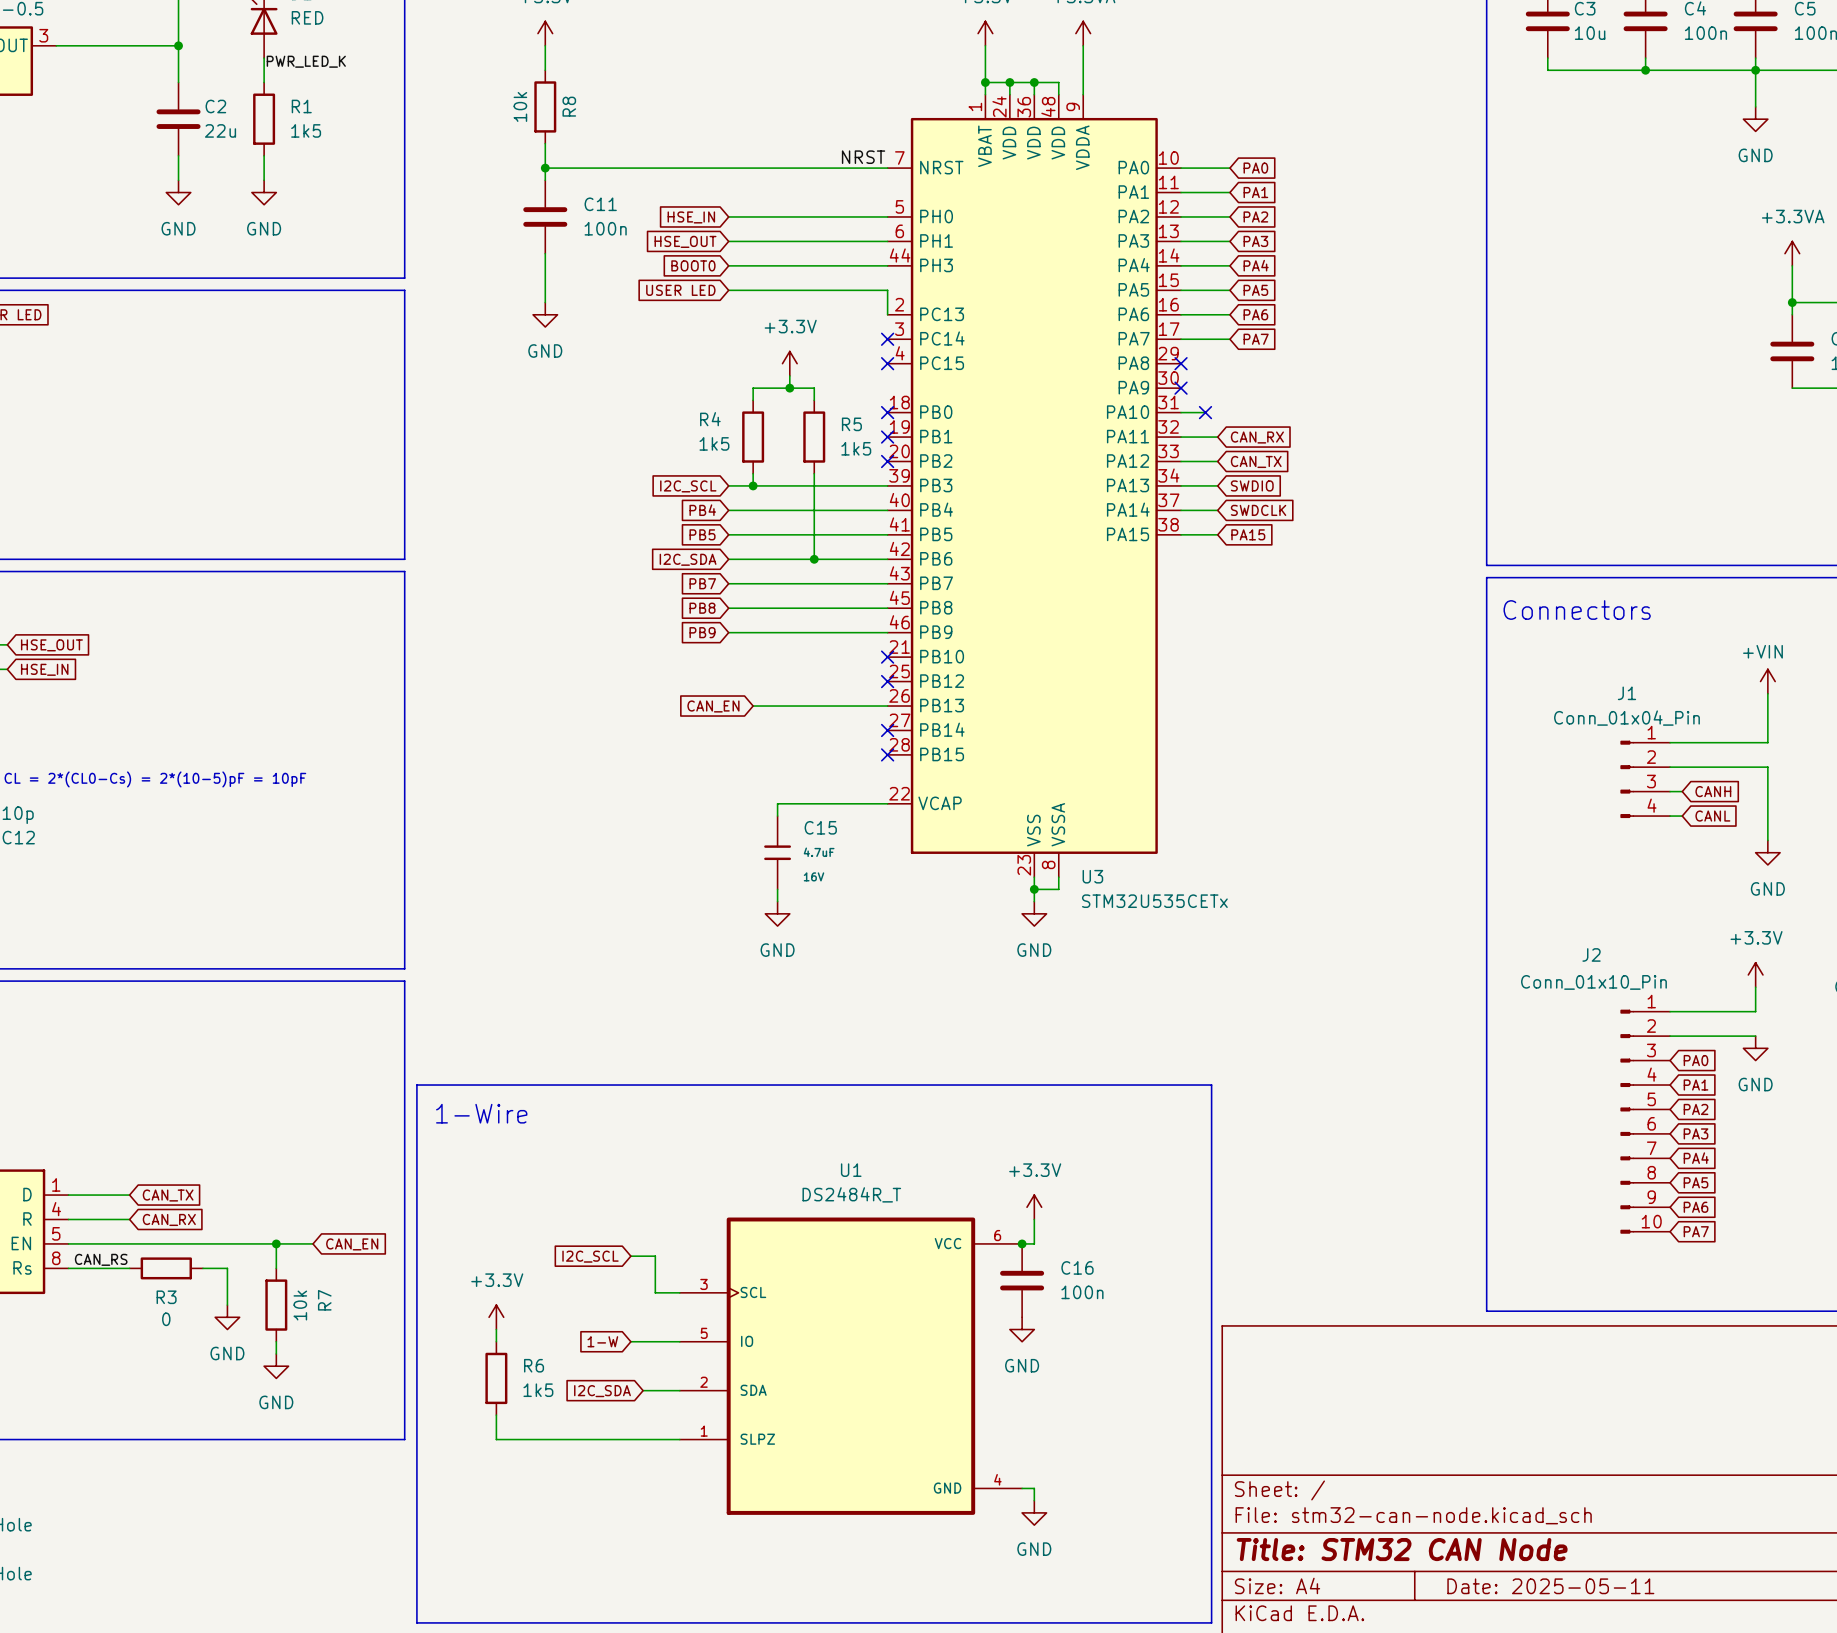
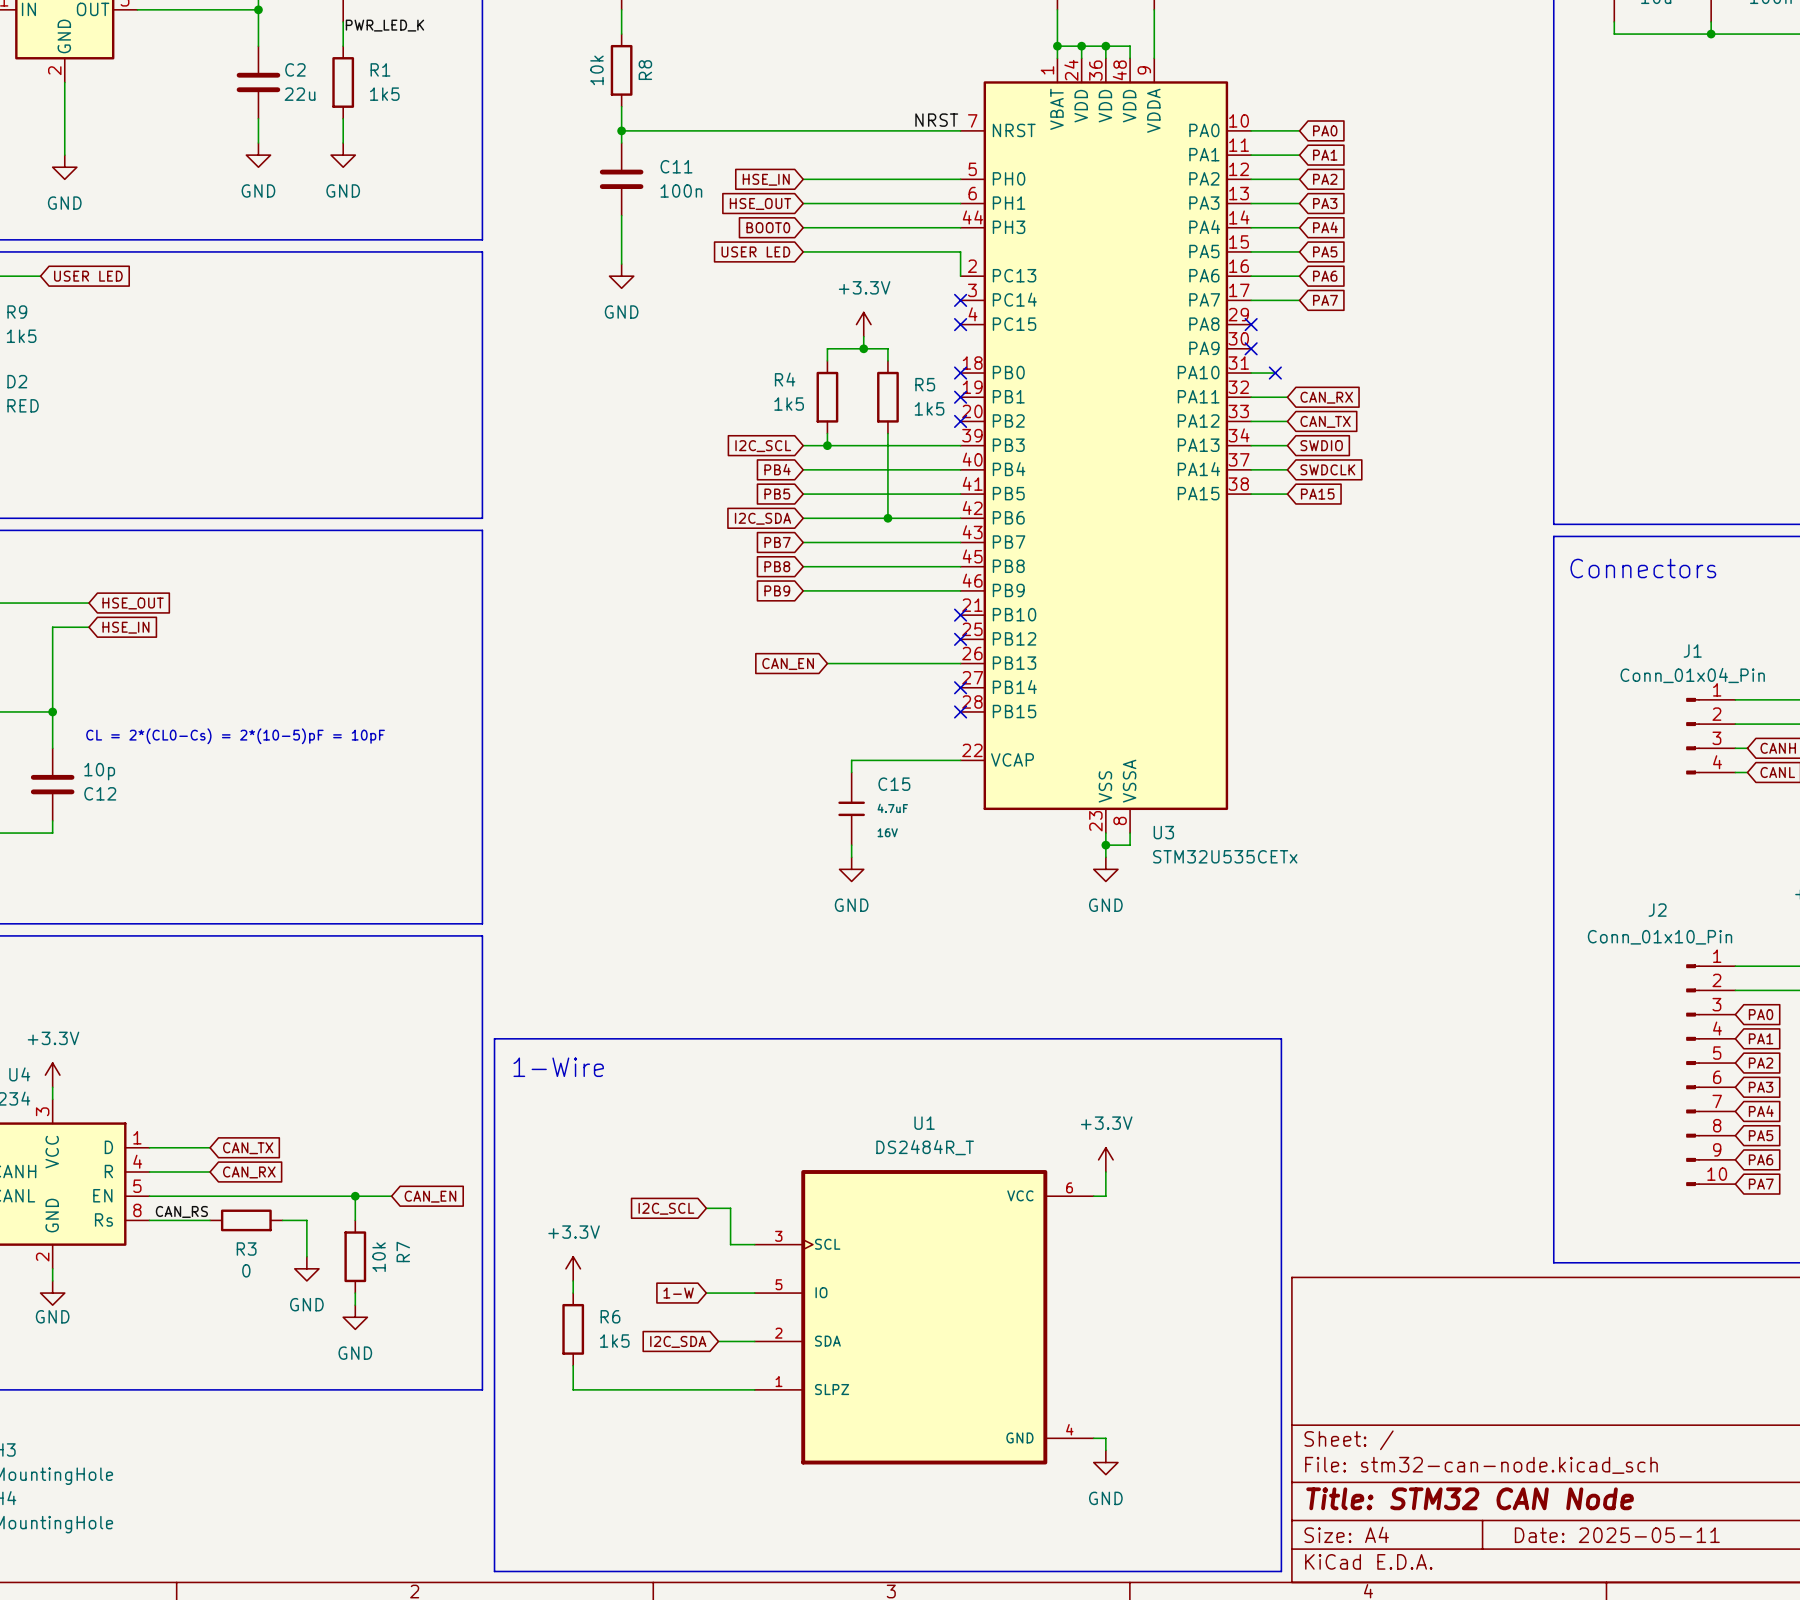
junction: (1022, 1243) -> none
C16: 100n (1022, 1280) -> none
power symbol: GND (1022, 1329) -> none

